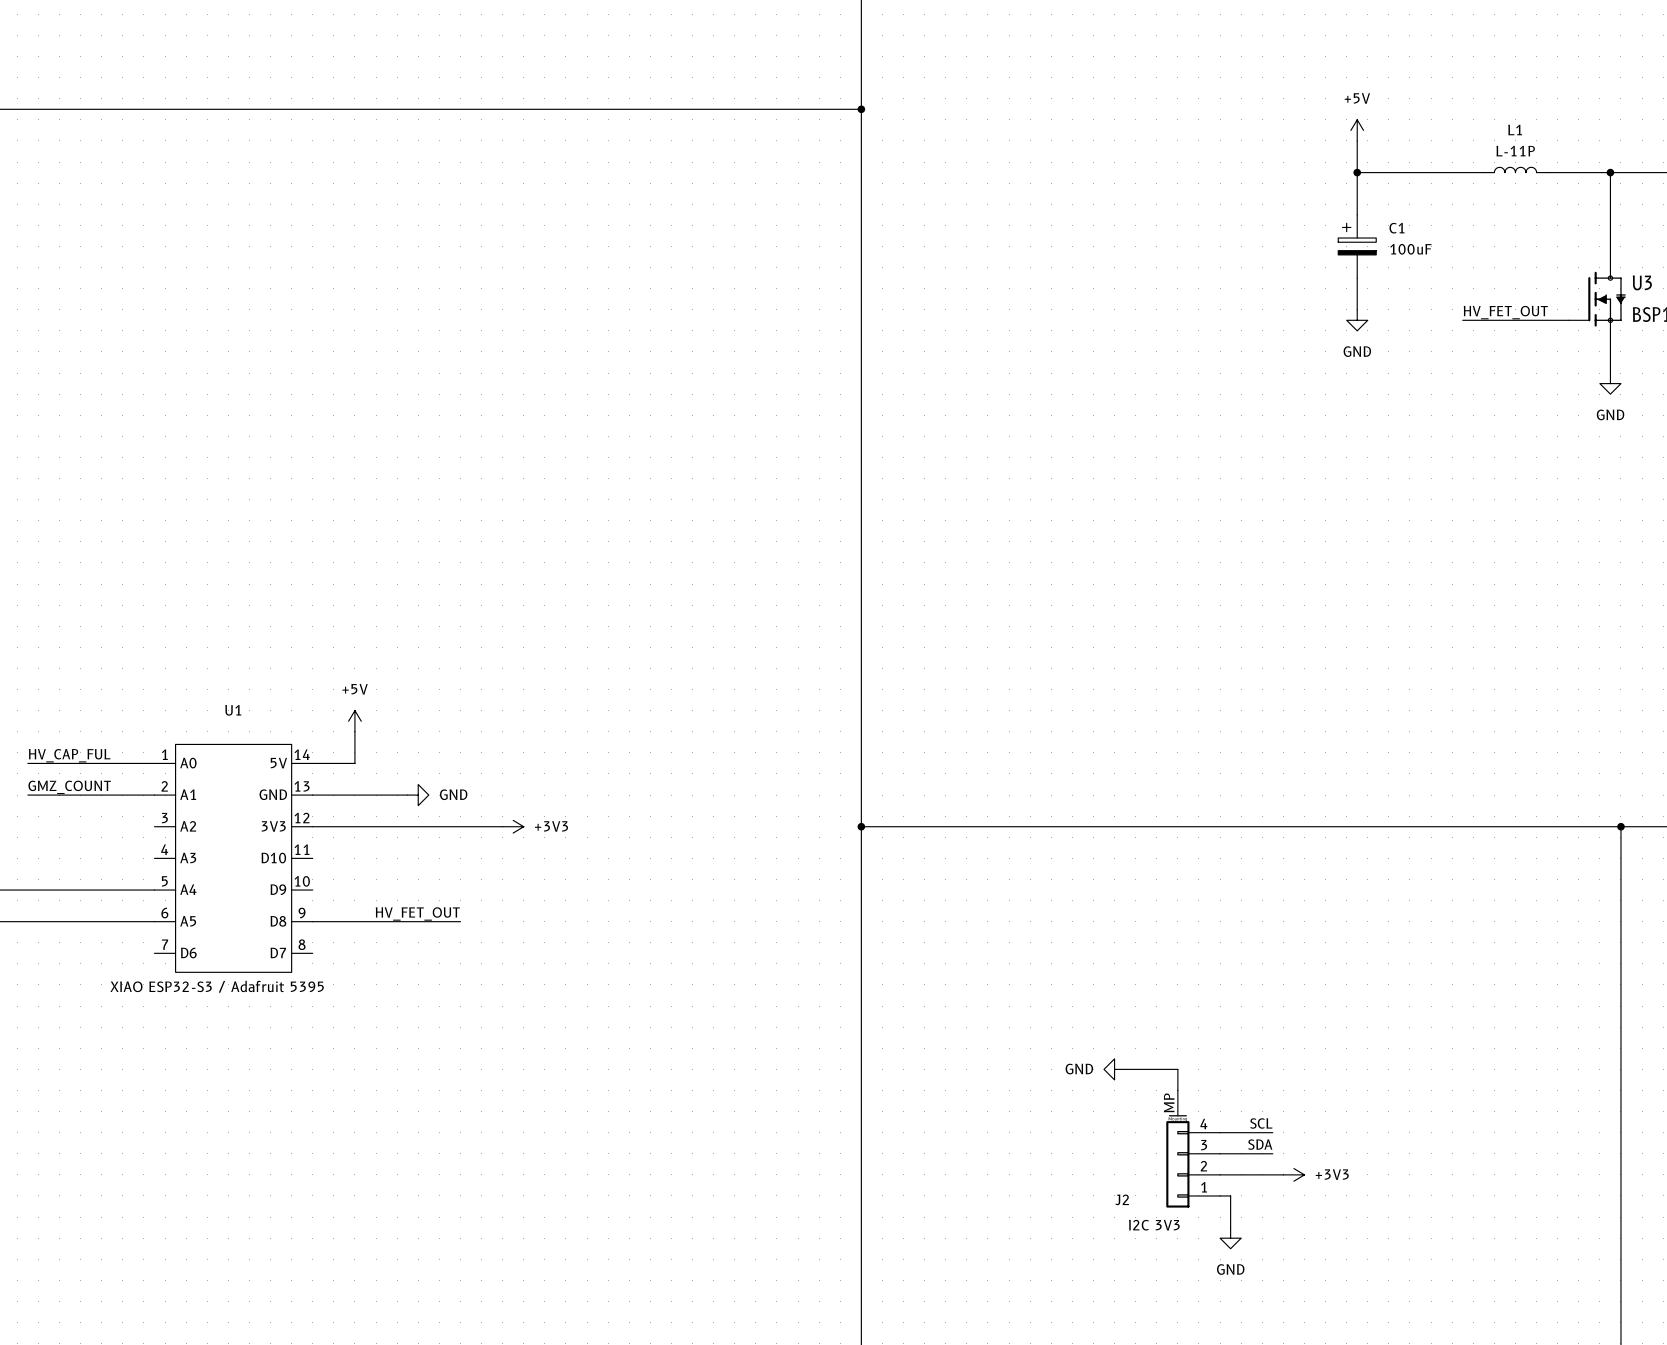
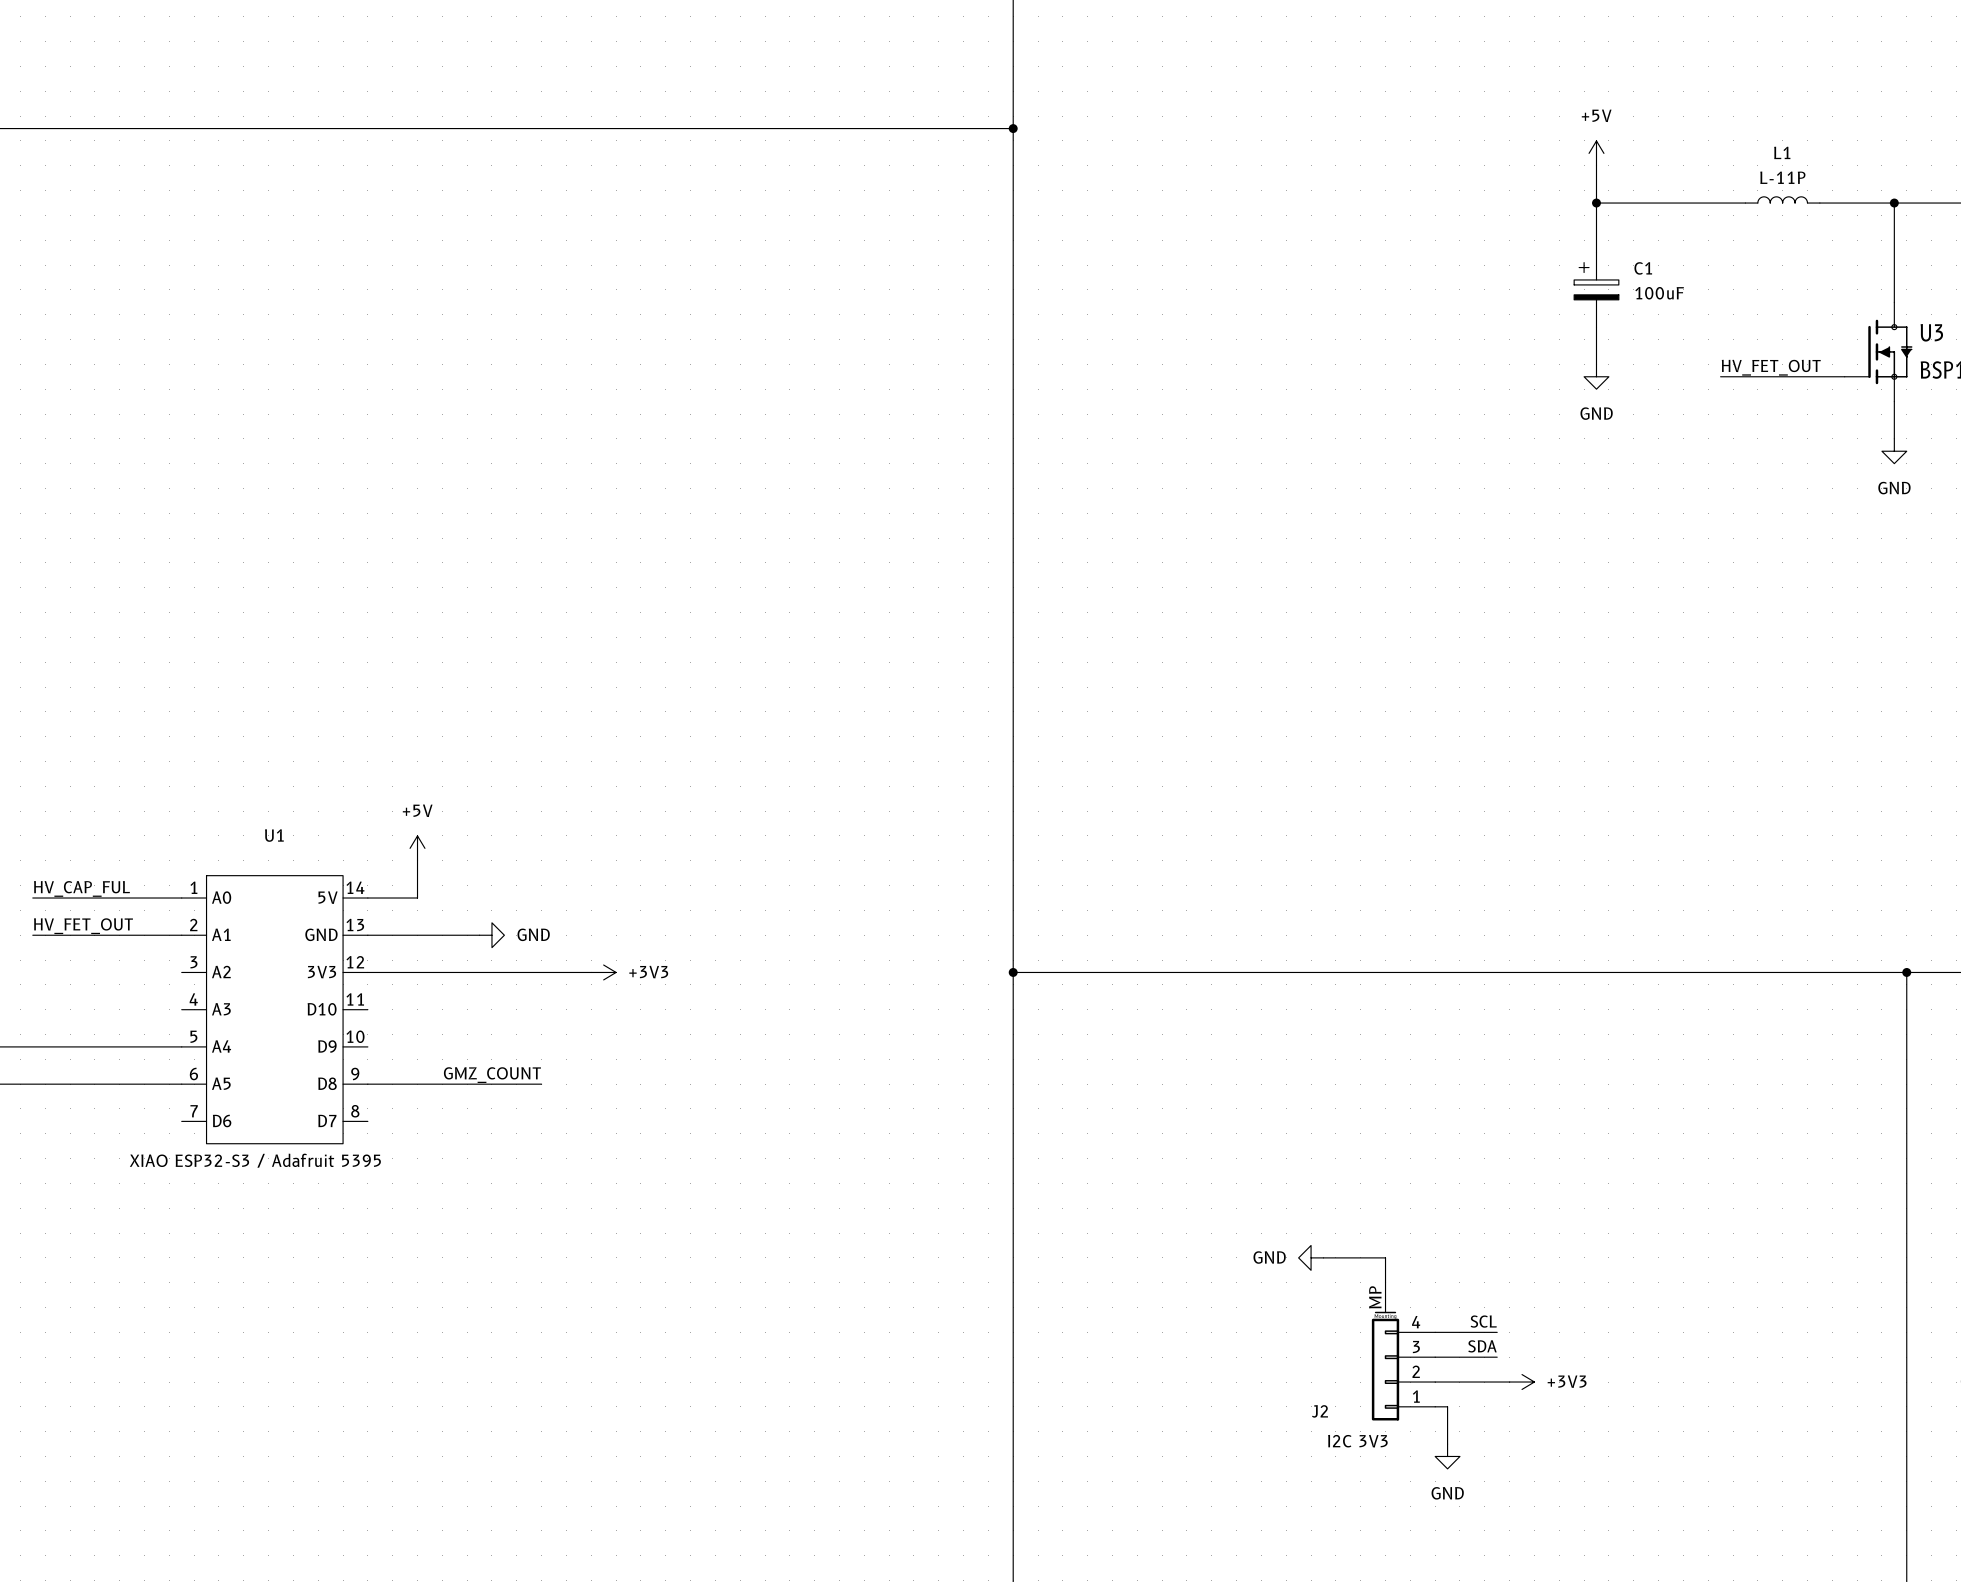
label: GMZ_COUNT (69, 787) -> HV_FET_OUT (83, 926)
label: HV_FET_OUT (417, 913) -> GMZ_COUNT (492, 1075)

